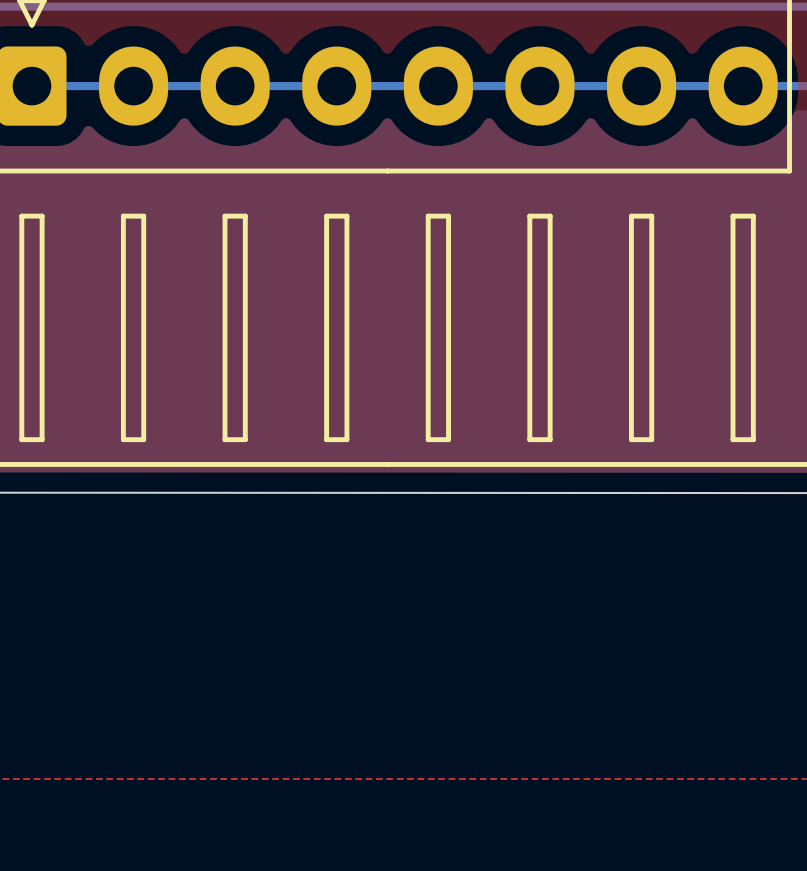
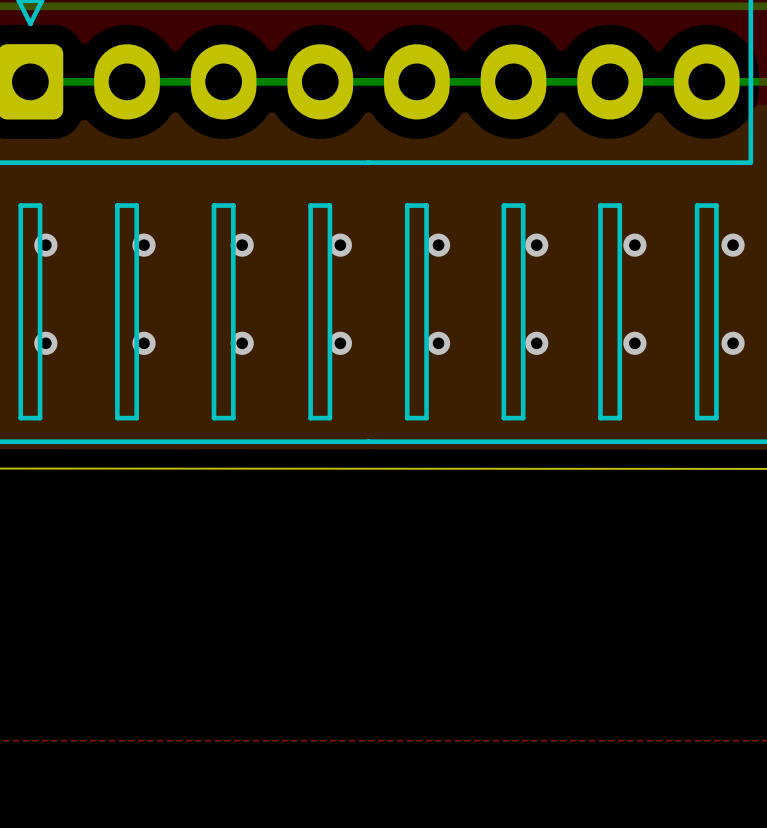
via: none -> (45, 245)
via: none -> (144, 245)
via: none -> (242, 245)
via: none -> (340, 245)
via: none -> (438, 245)
via: none -> (536, 245)
via: none -> (634, 245)
via: none -> (733, 245)
via: none -> (45, 343)
via: none -> (144, 343)
via: none -> (242, 343)
via: none -> (340, 343)
via: none -> (438, 343)
via: none -> (536, 343)
via: none -> (634, 343)
via: none -> (733, 343)

